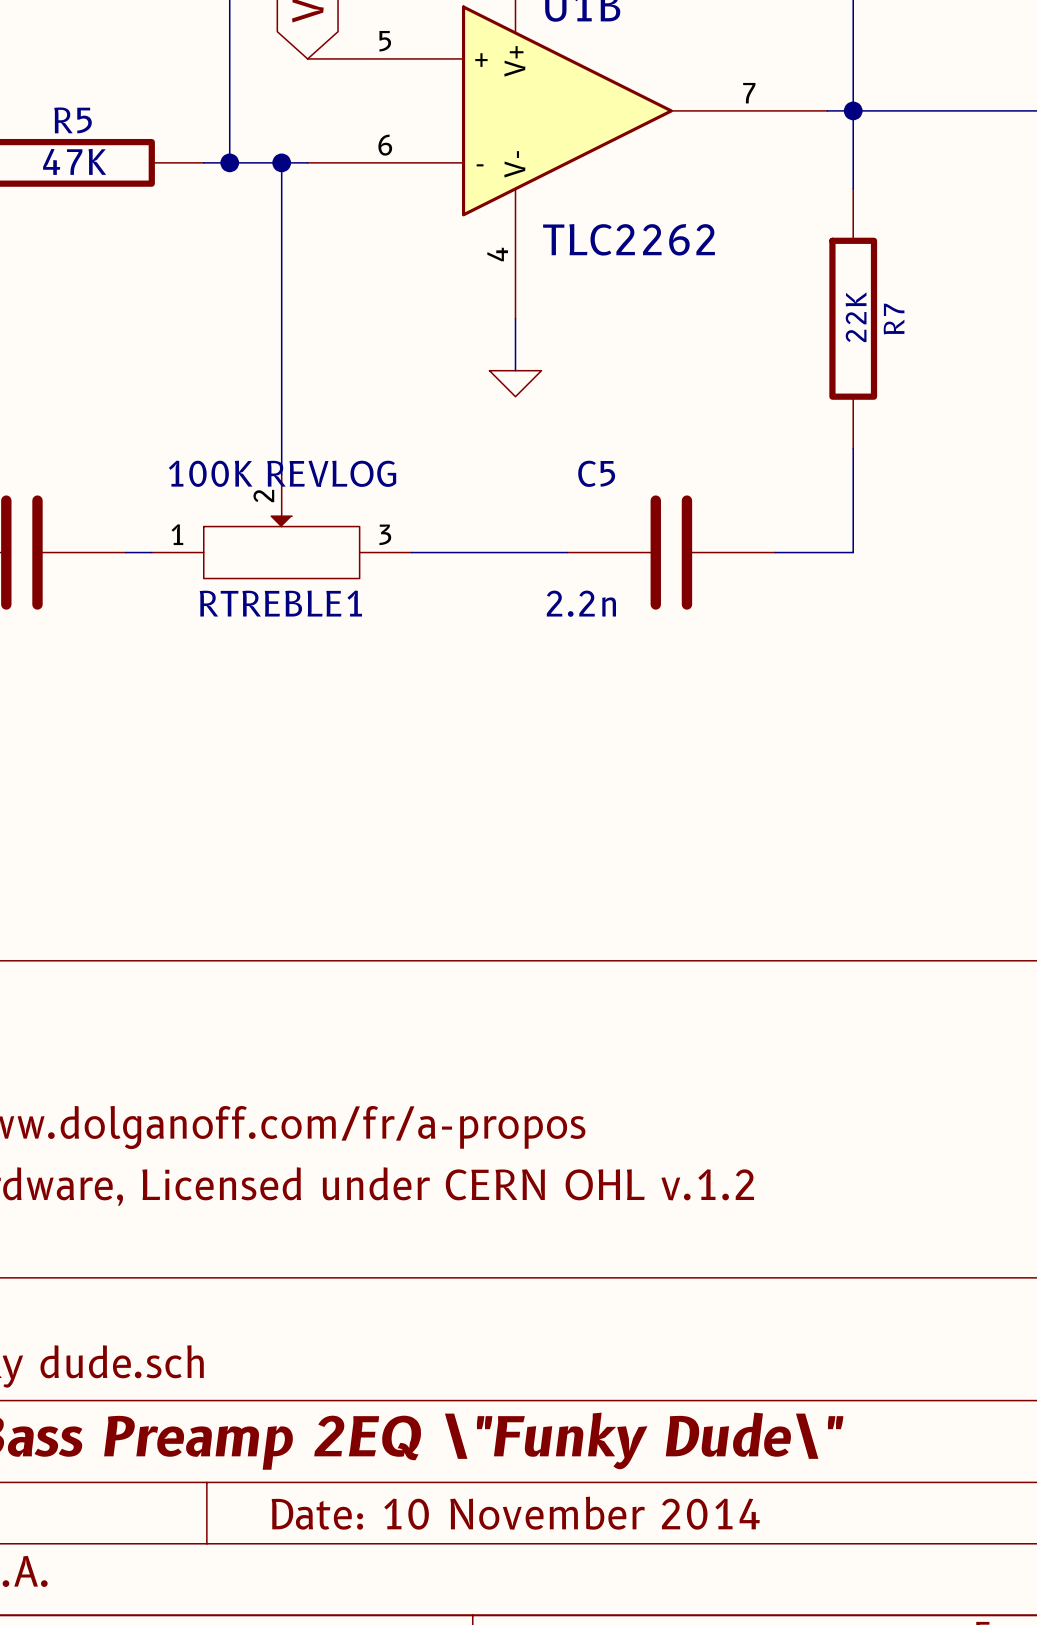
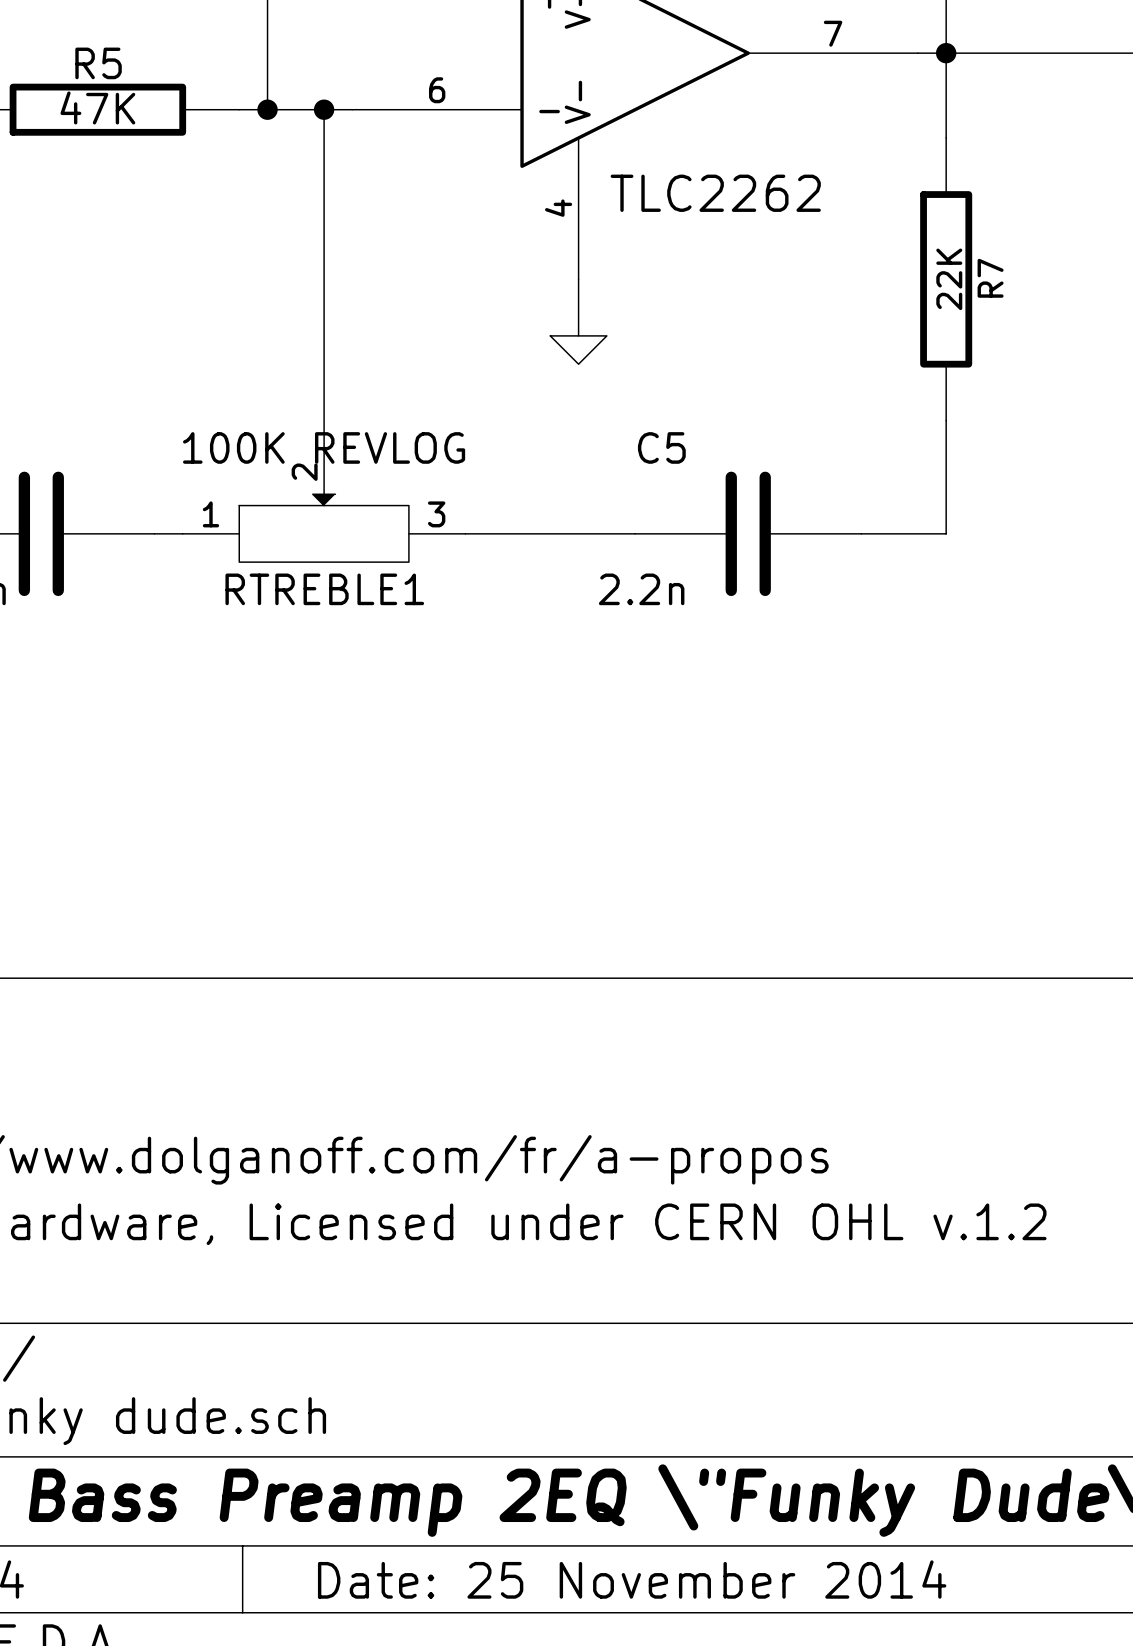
title block: Date: 10 November 2014 (515, 1513) -> Date: 25 November 2014 (632, 1579)

